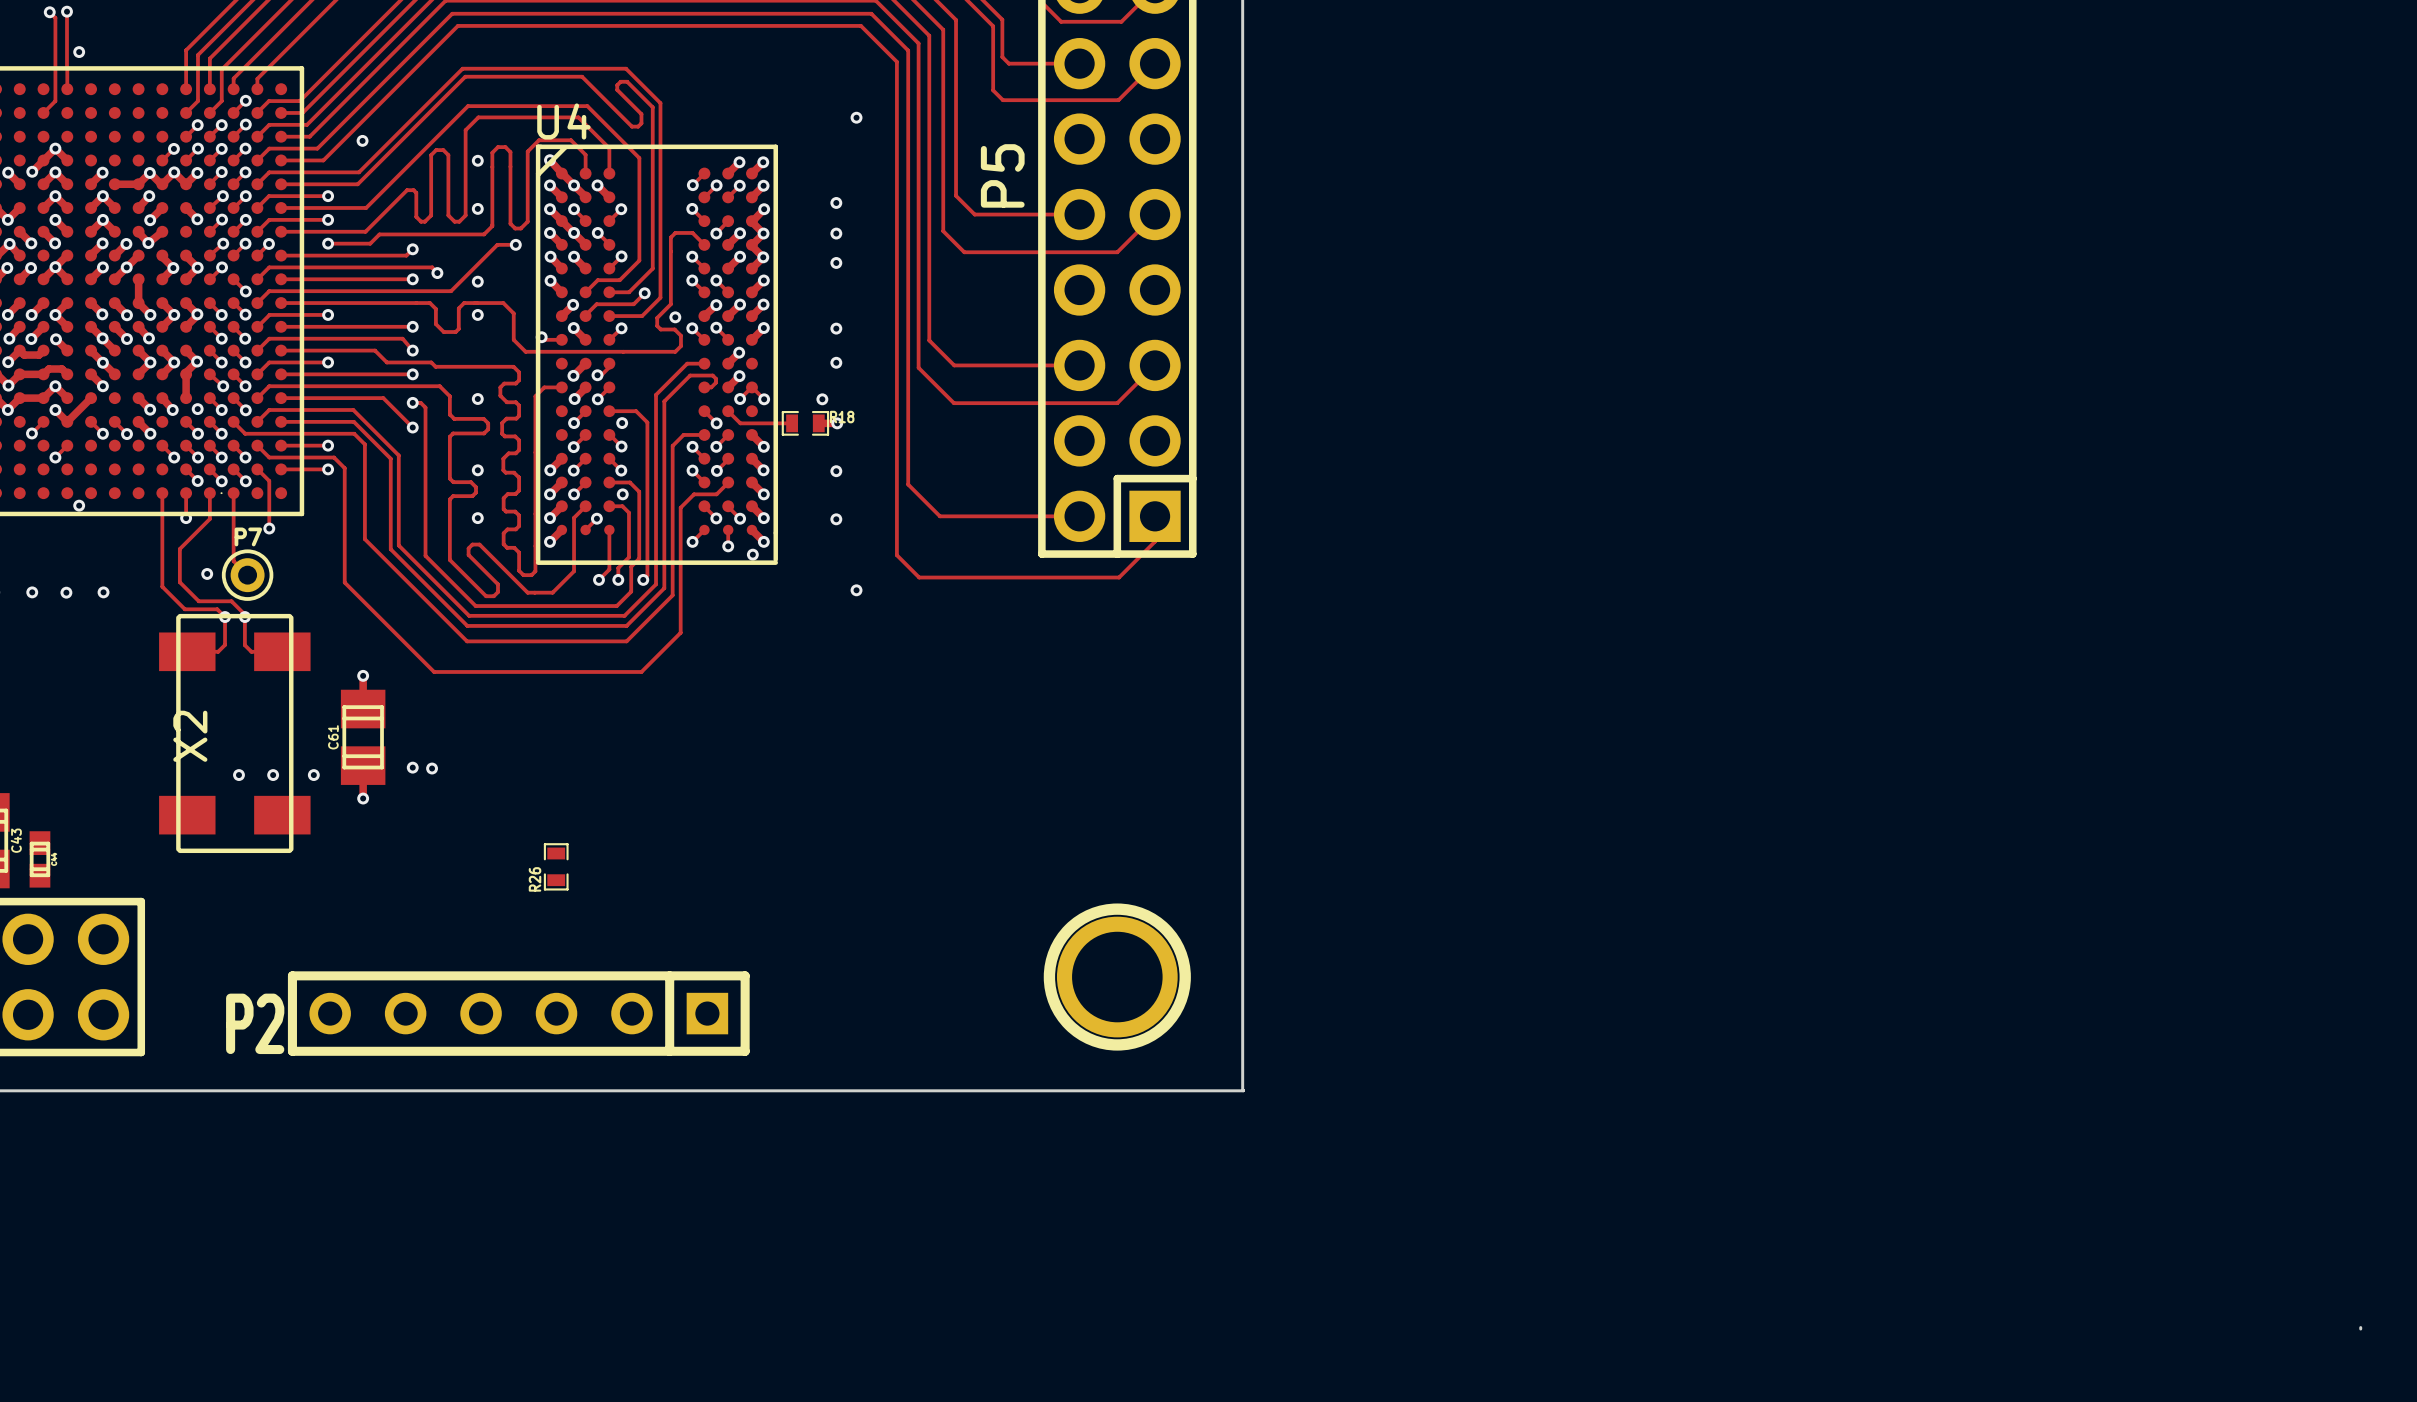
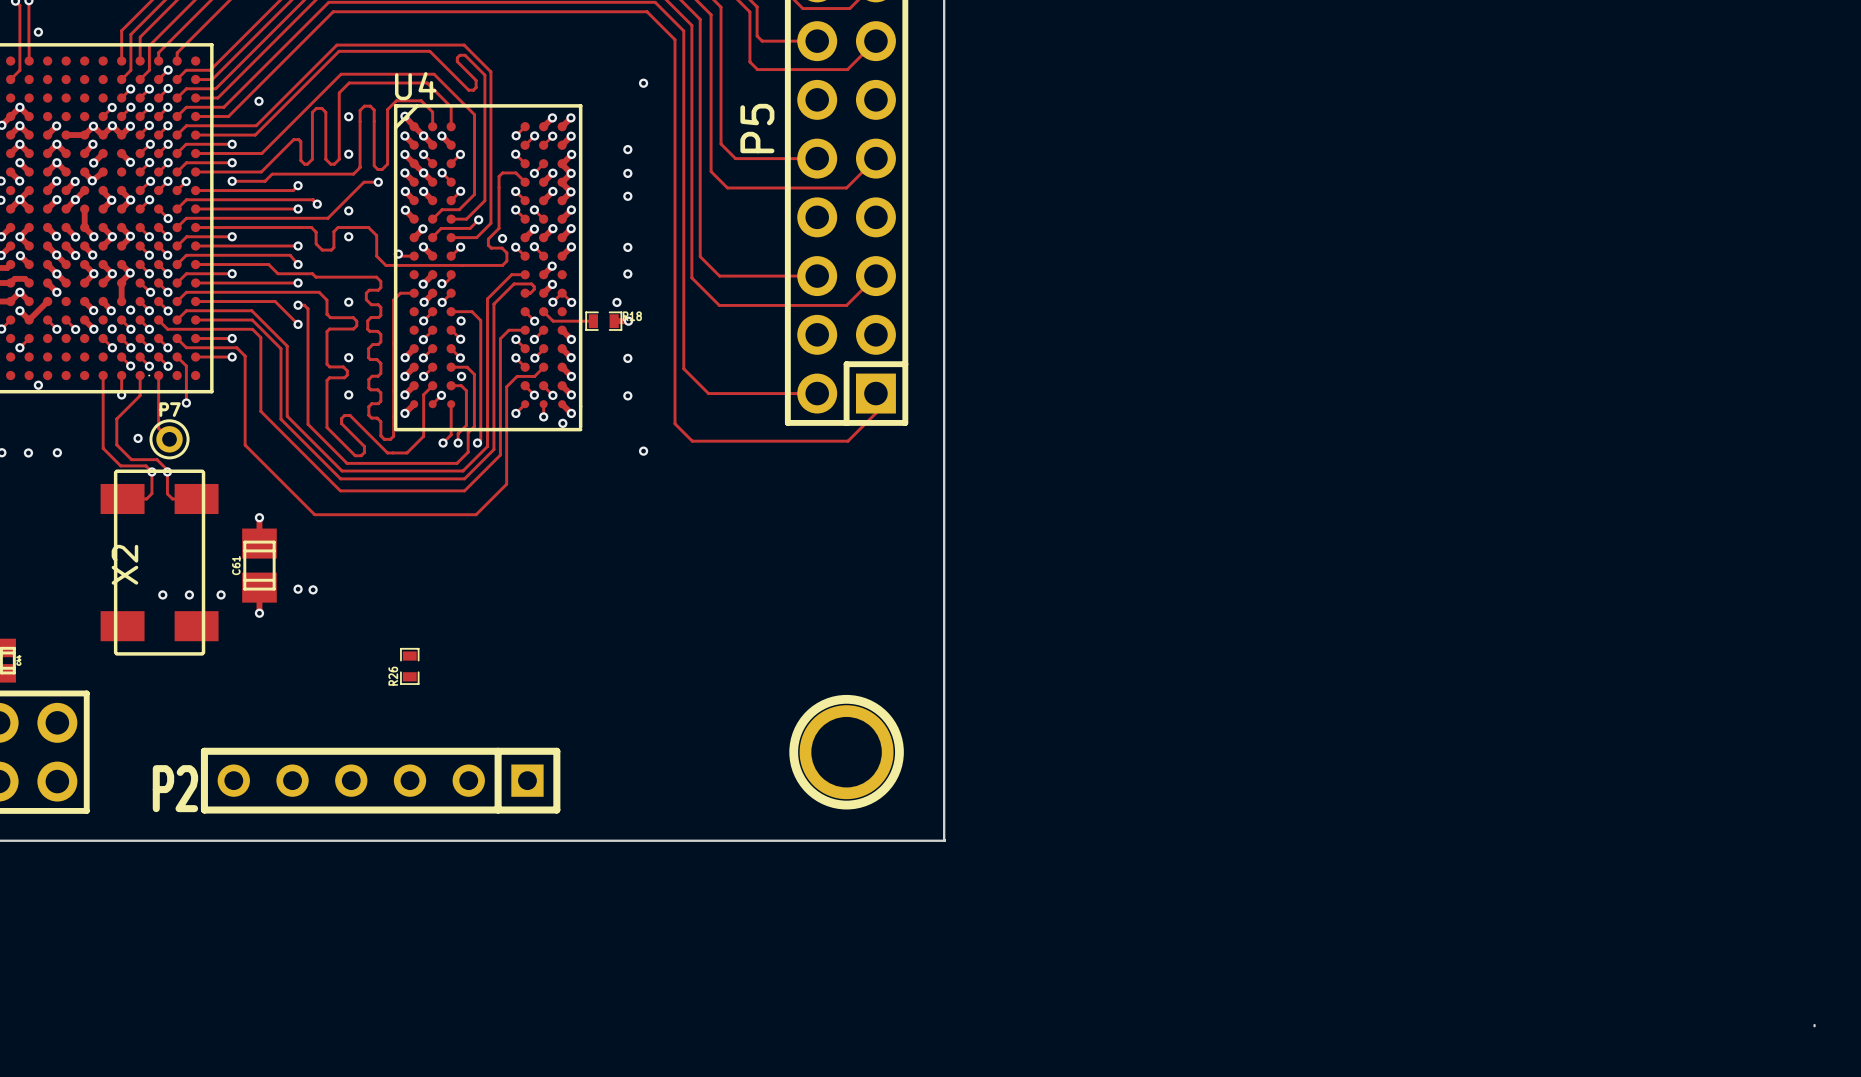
via: none -> (112, 329)

